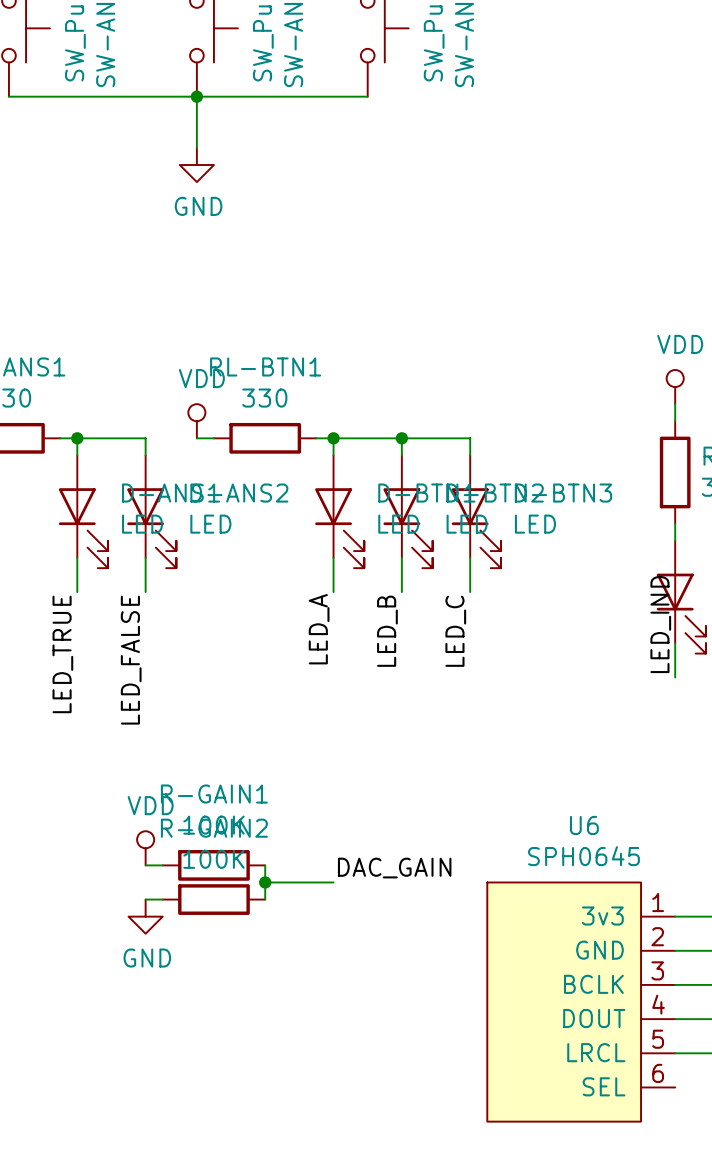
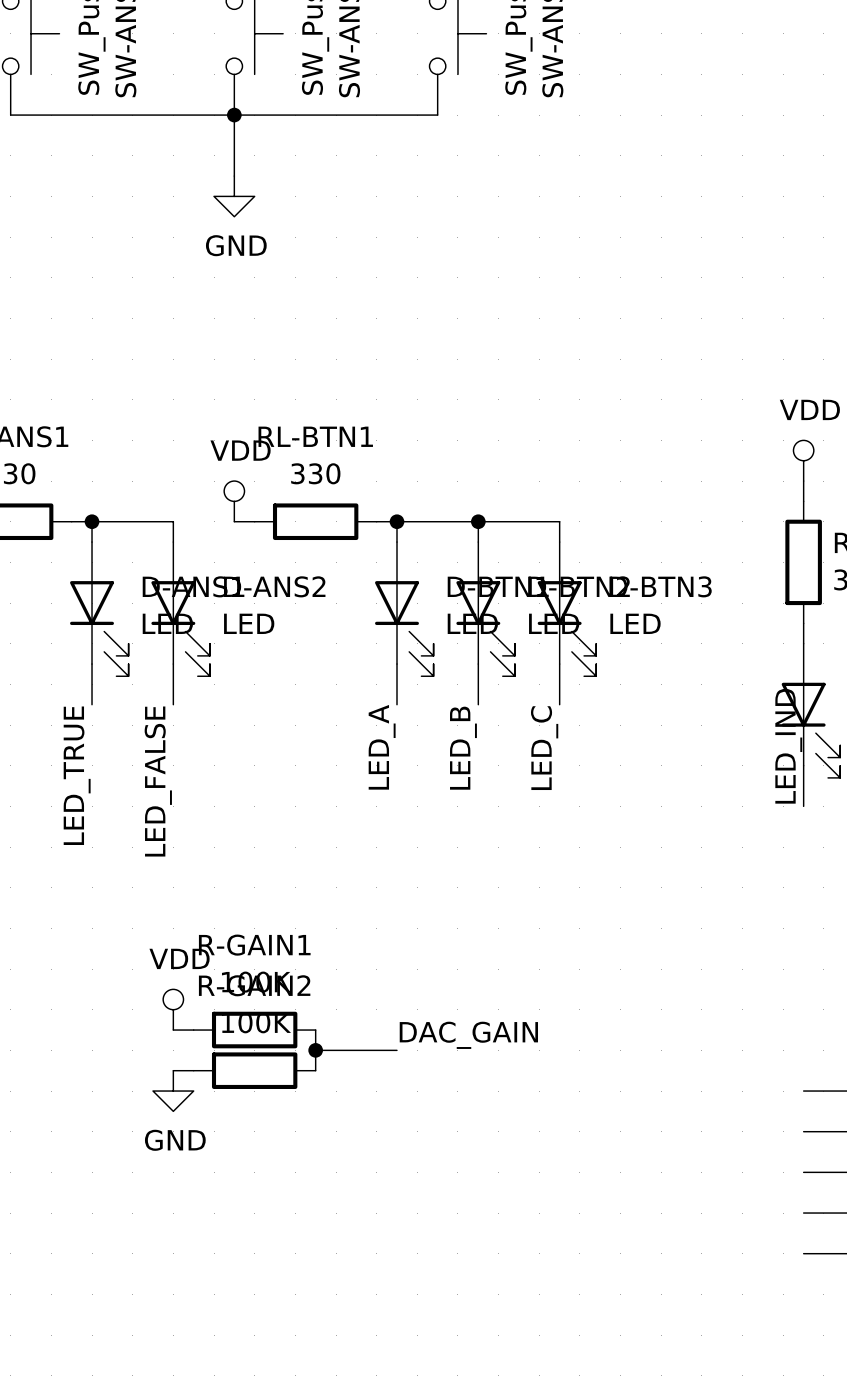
U6: SPH0645 (581, 1002) -> none

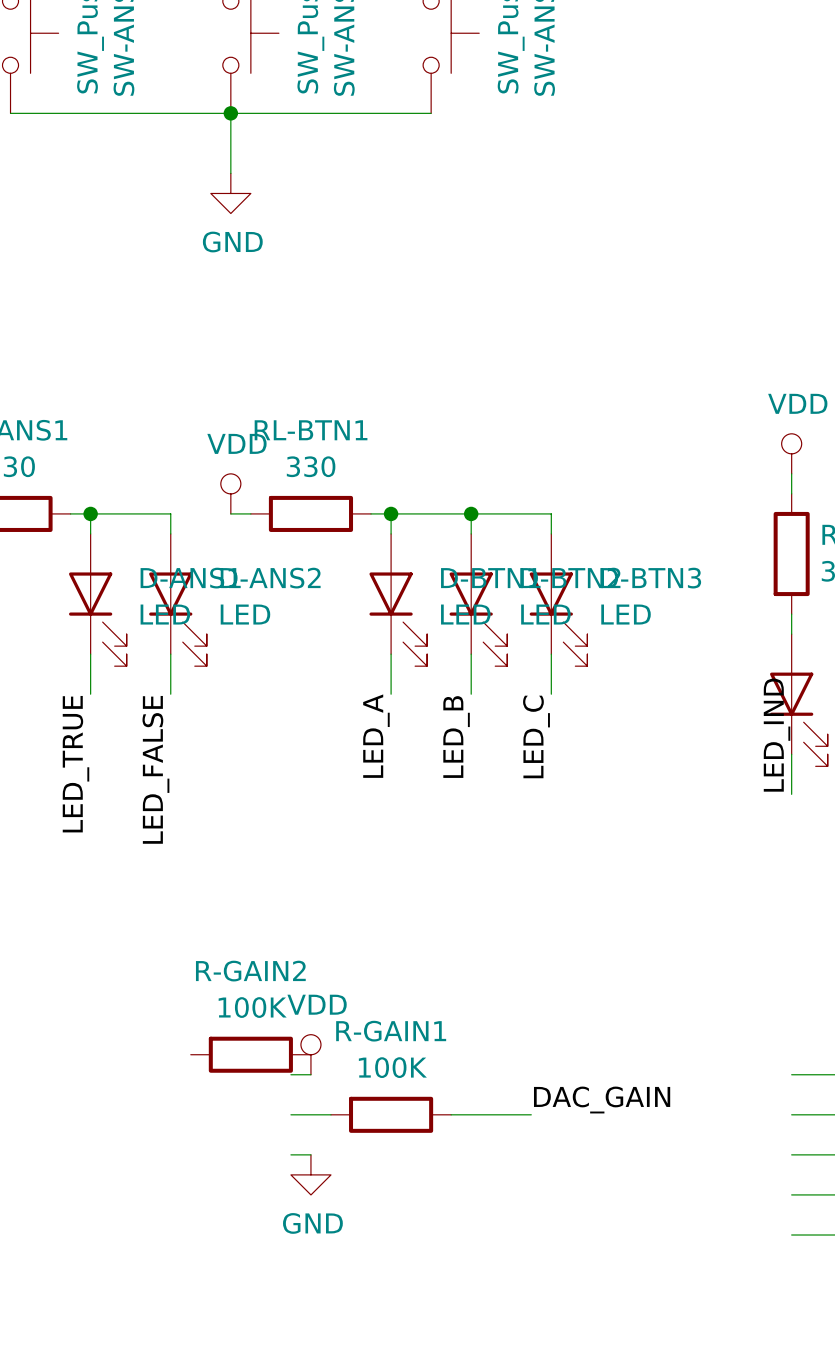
power symbol position: VDD (173, 1009) -> VDD (310, 1054)
wire: (173, 1030) (193, 1030) -> (290, 1154) (310, 1154)
R-GAIN1 position: (254, 1030) -> (391, 1114)
wire: (315, 1030) (315, 1070) -> none
label position: DAC_GAIN (468, 1035) -> DAC_GAIN (602, 1100)
wire: (315, 1050) (396, 1050) -> (451, 1114) (531, 1114)
junction: (315, 1050) -> none
wire: (173, 1070) (193, 1070) -> (290, 1074) (310, 1074)
power symbol position: GND (173, 1091) -> GND (310, 1174)
wire: none -> (290, 1114) (330, 1114)

